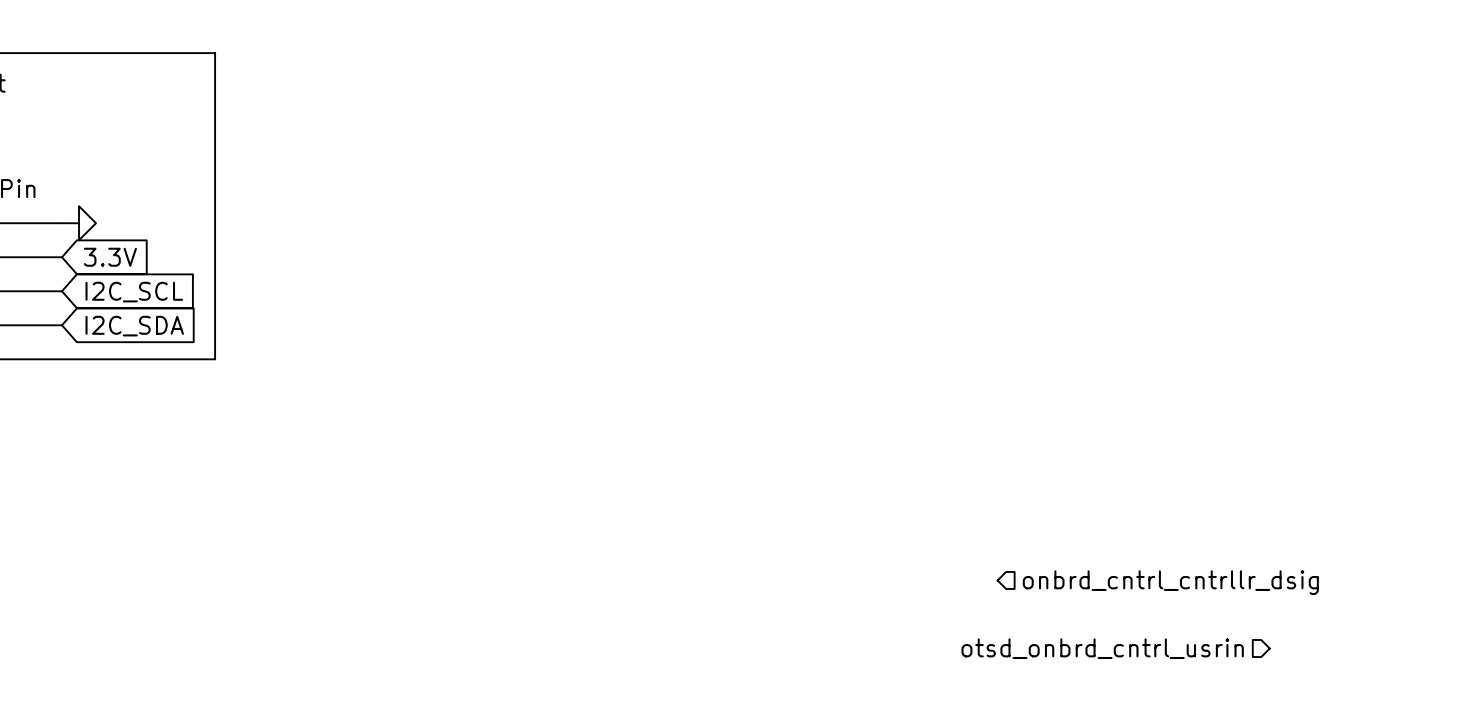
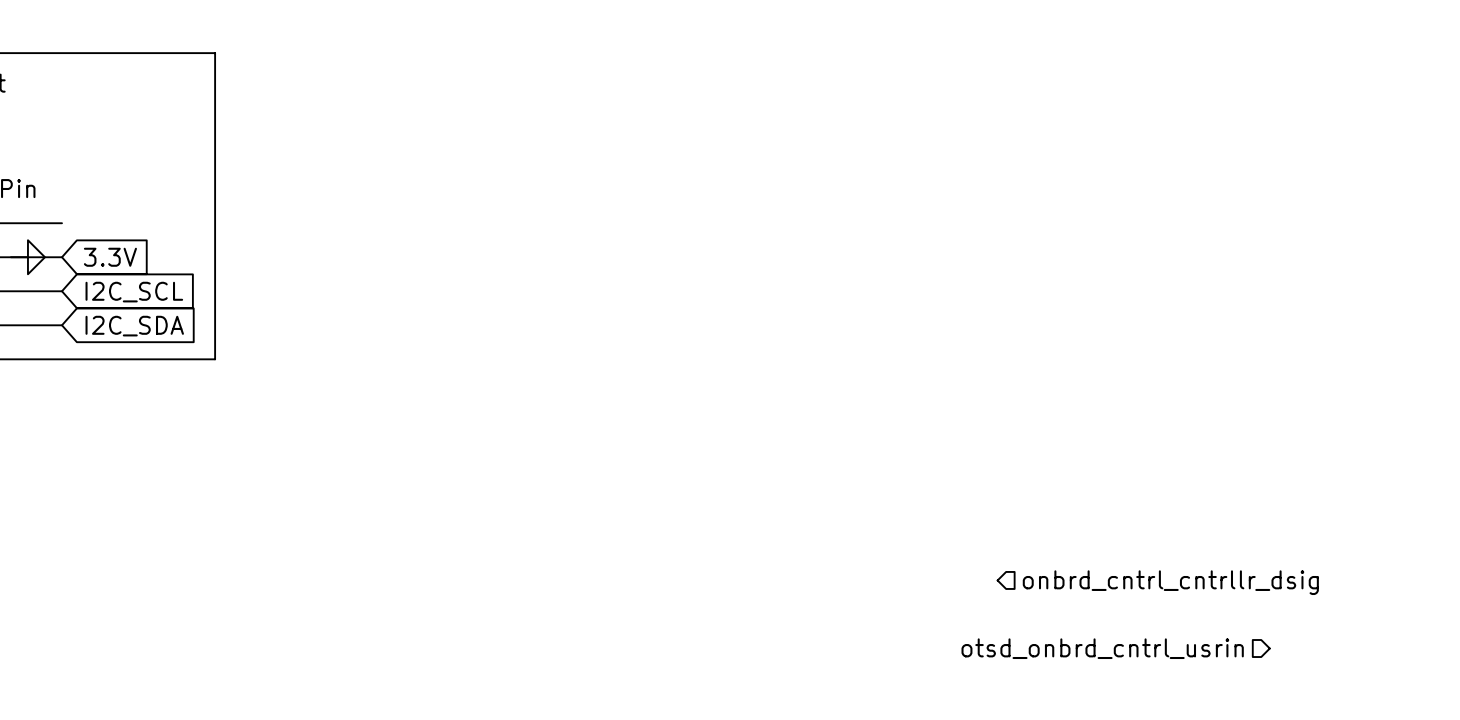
power symbol position: (79, 223) -> (27, 257)

